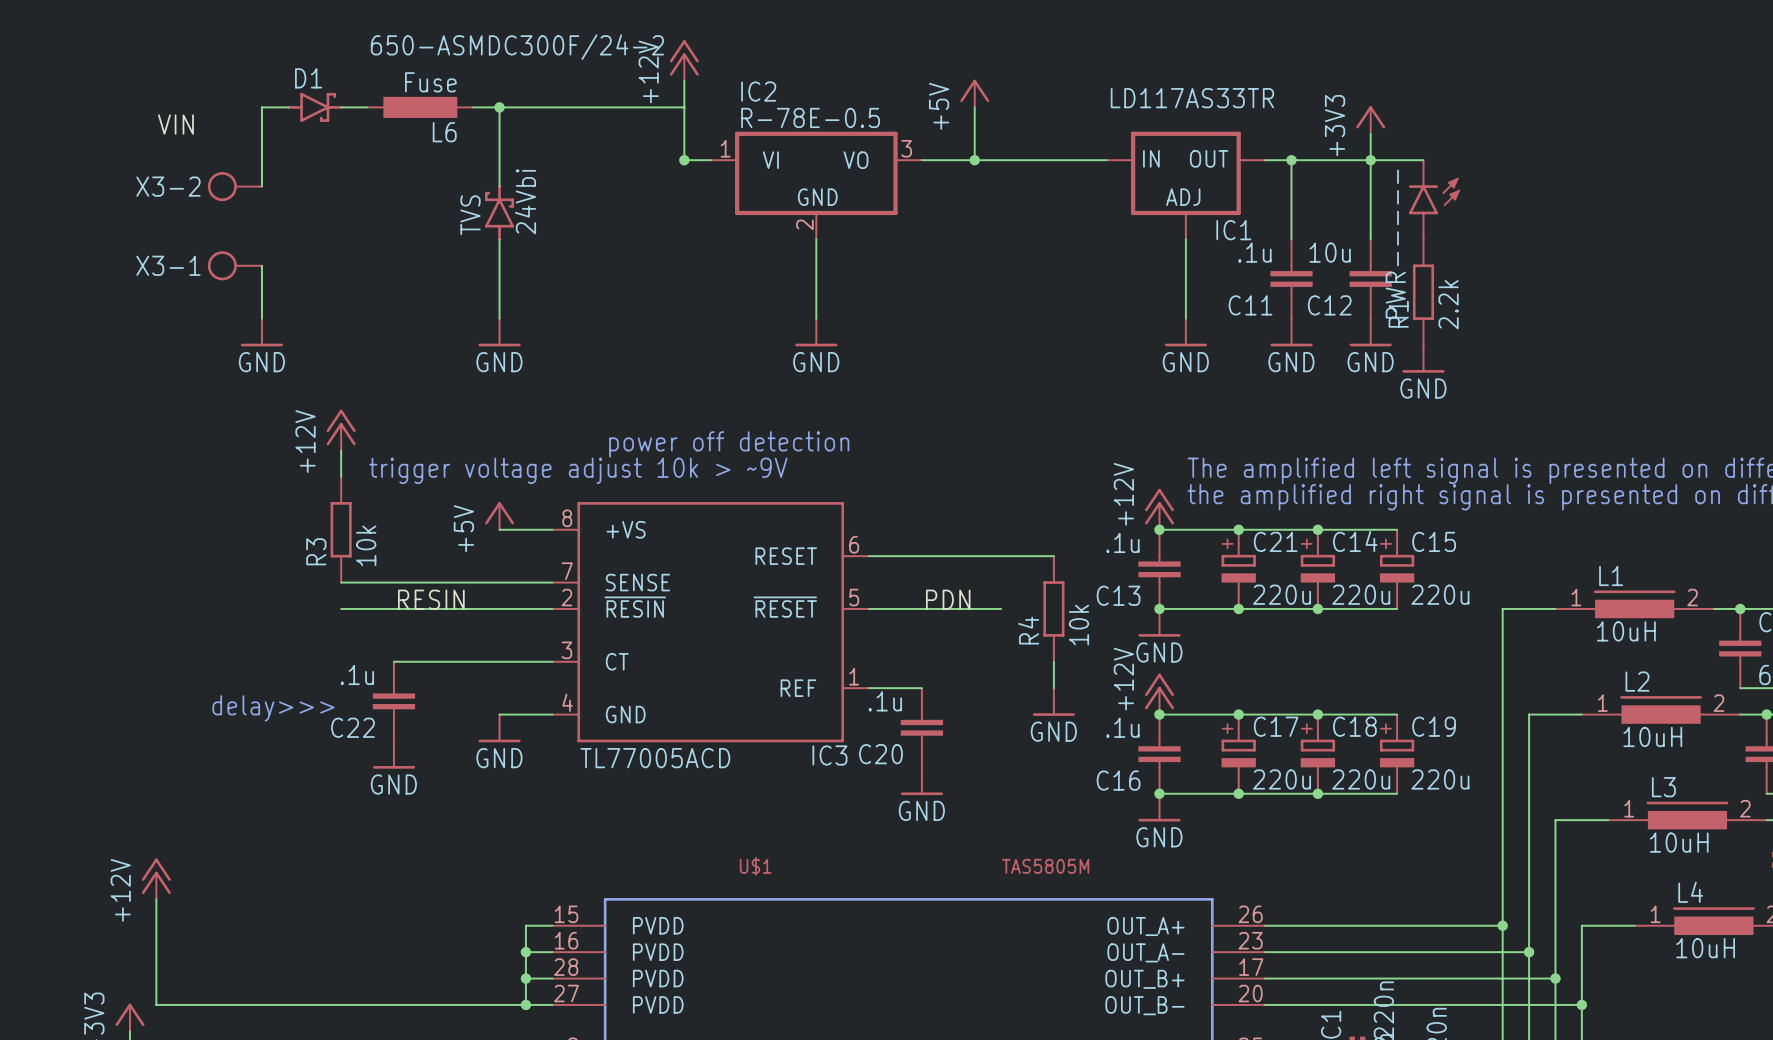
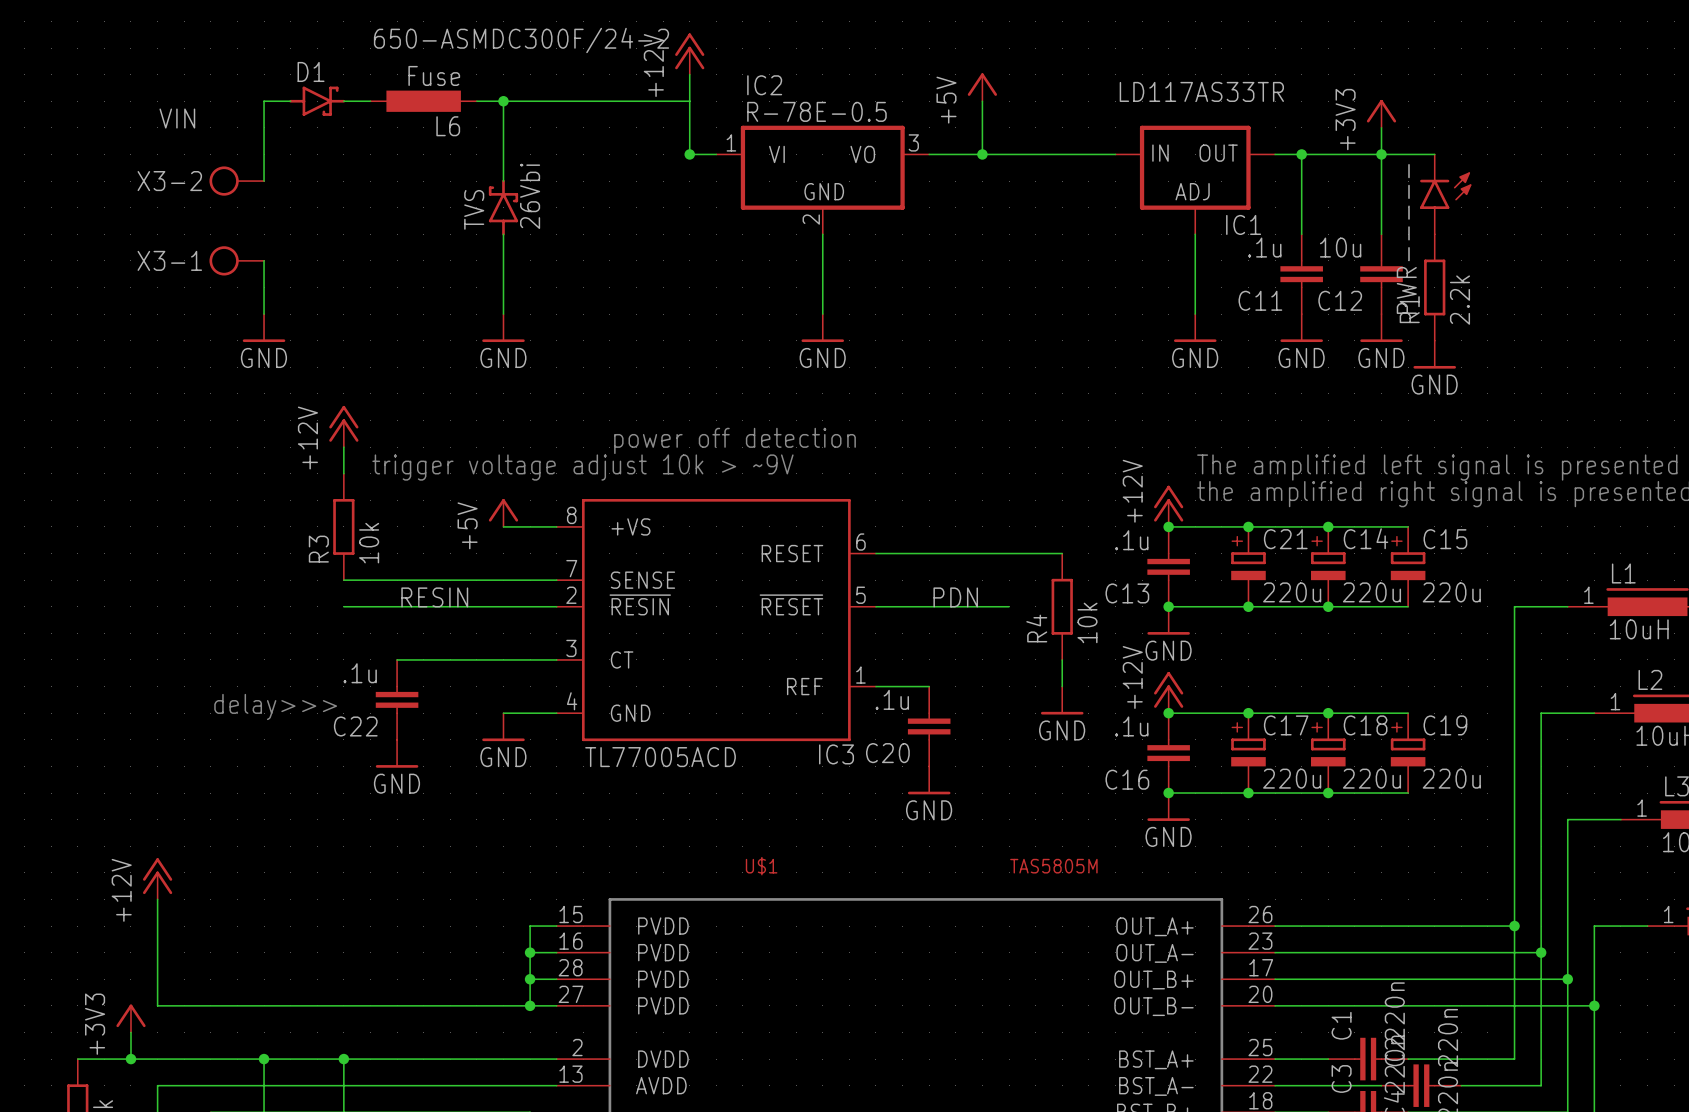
TVS value: 24Vbi (525, 201) -> 26Vbi (530, 196)

